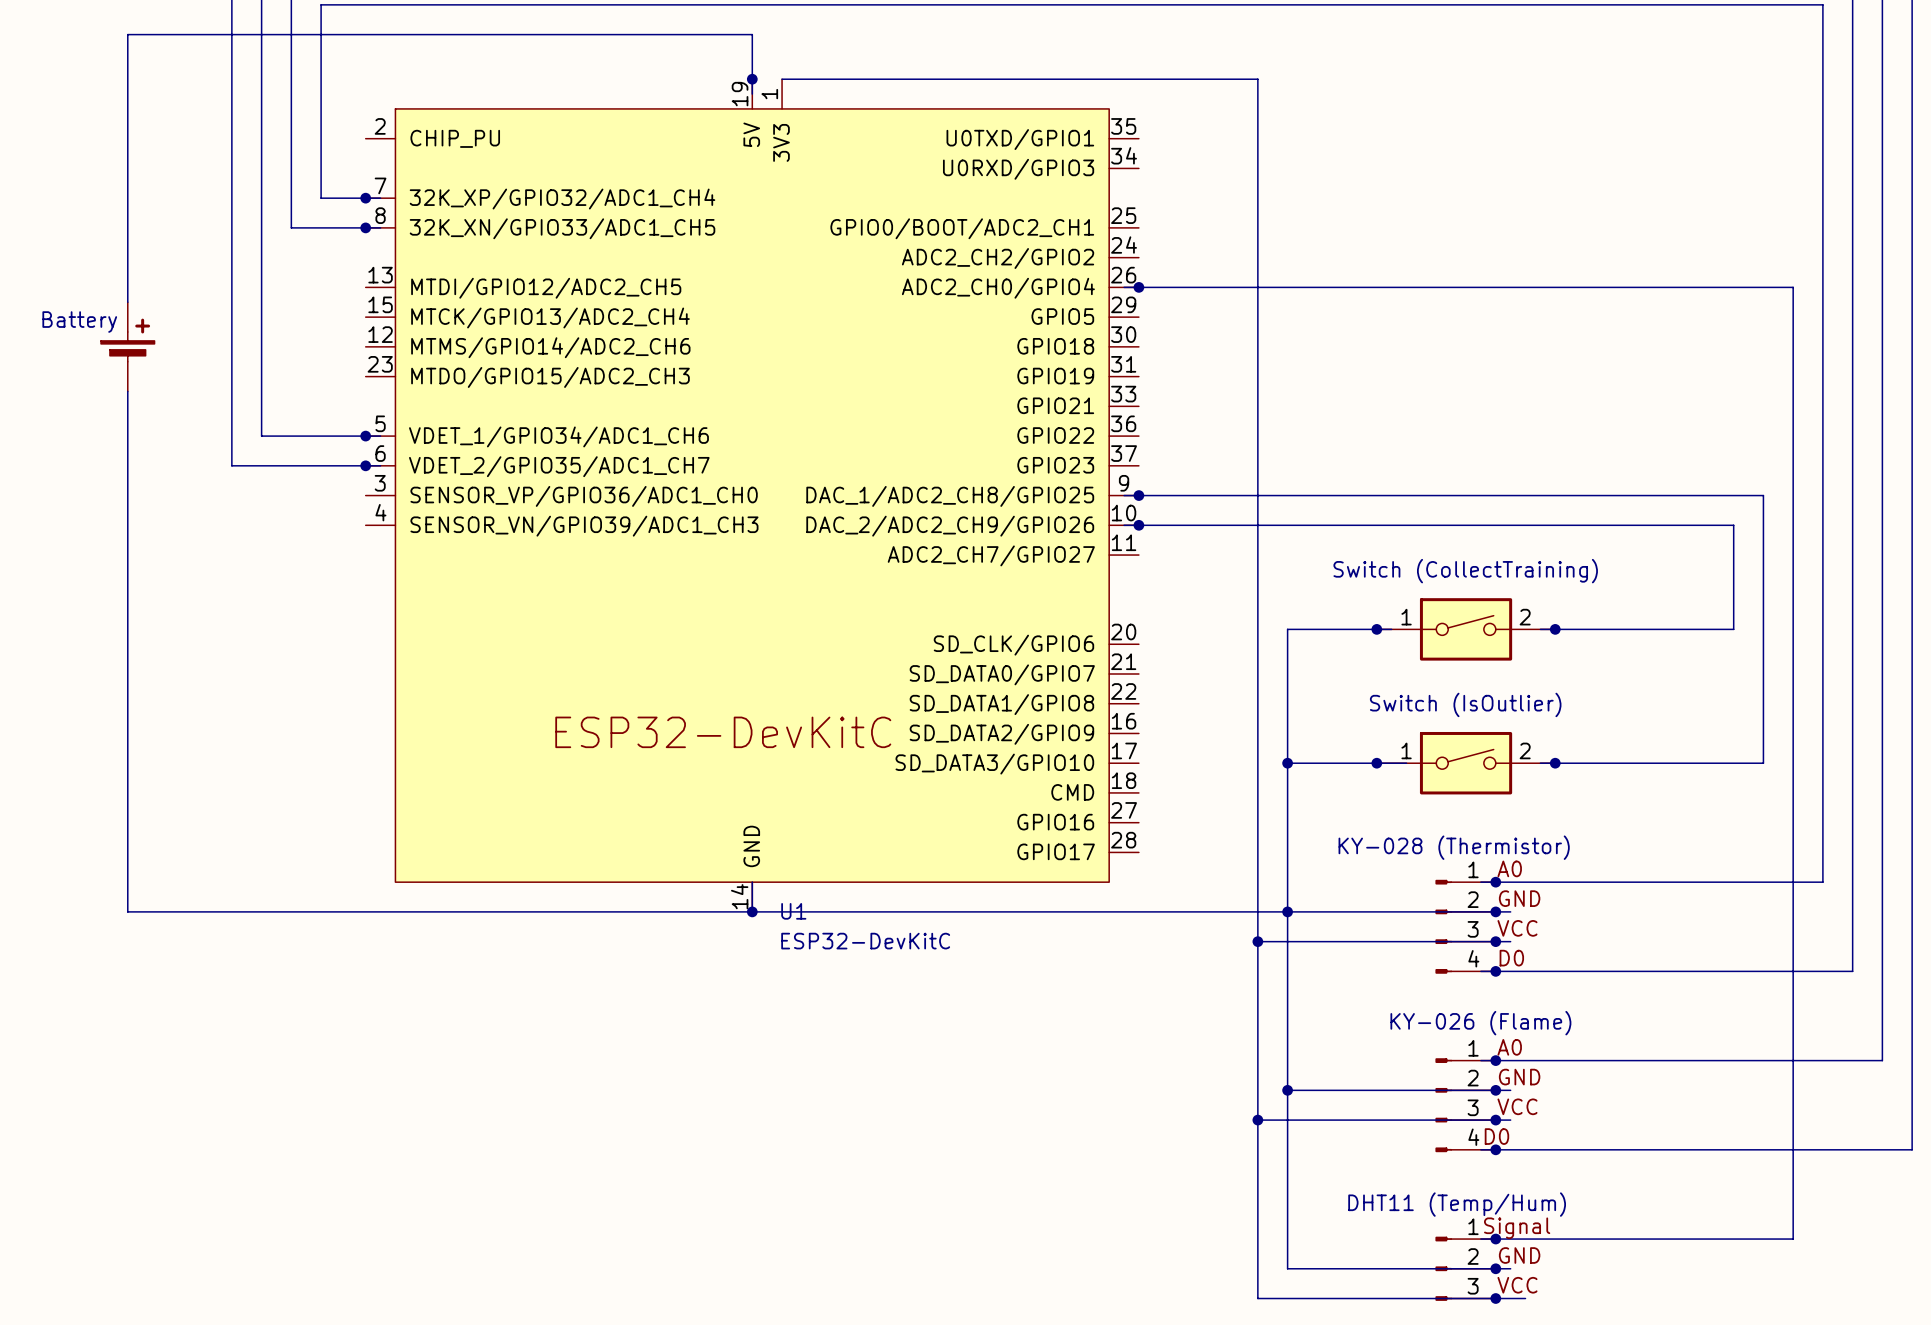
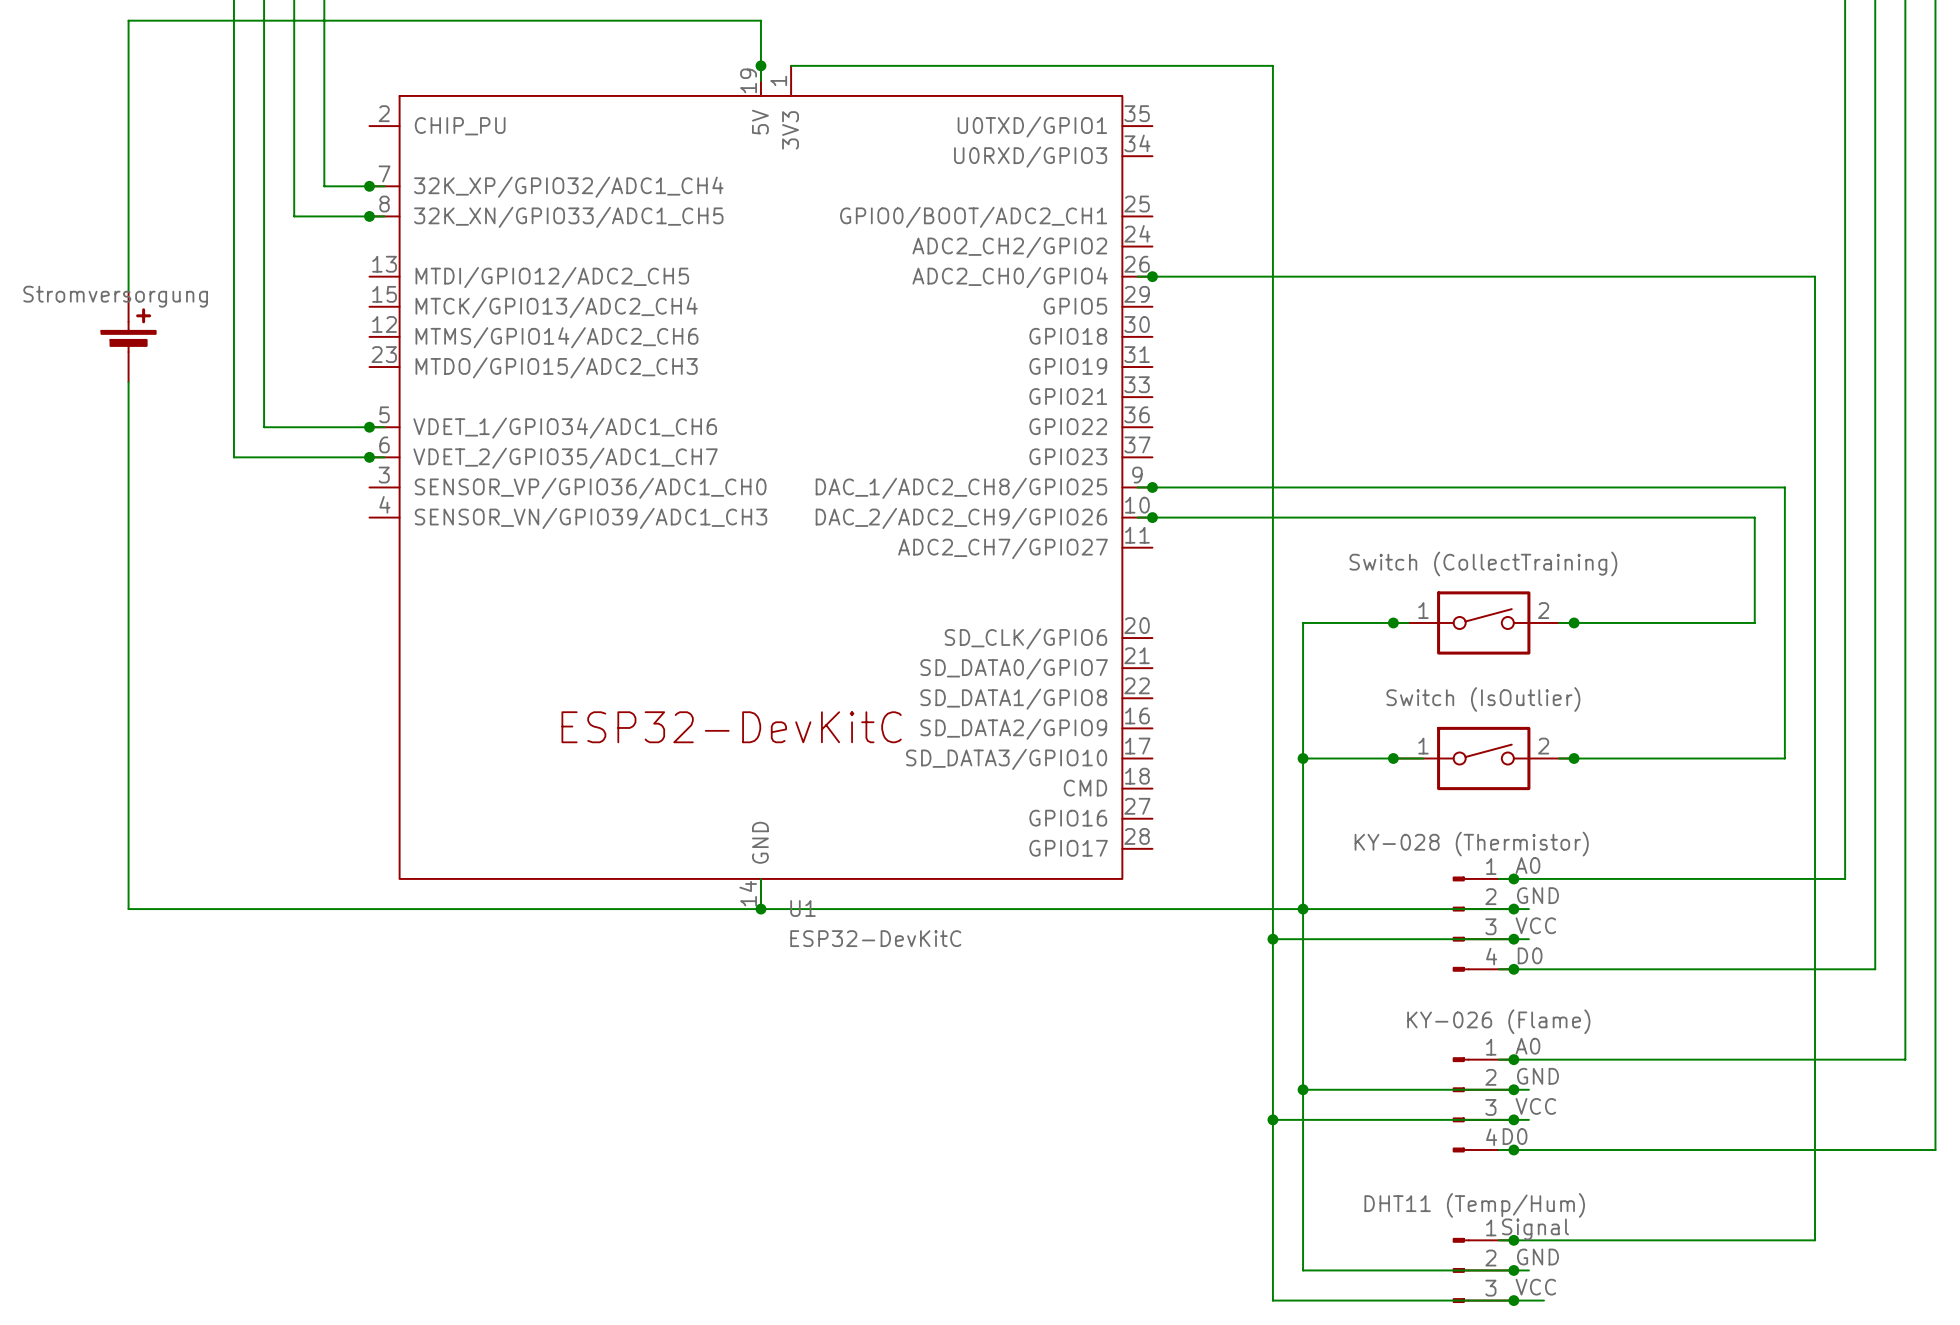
part value: Battery (79, 322) -> Stromversorgung (115, 296)

